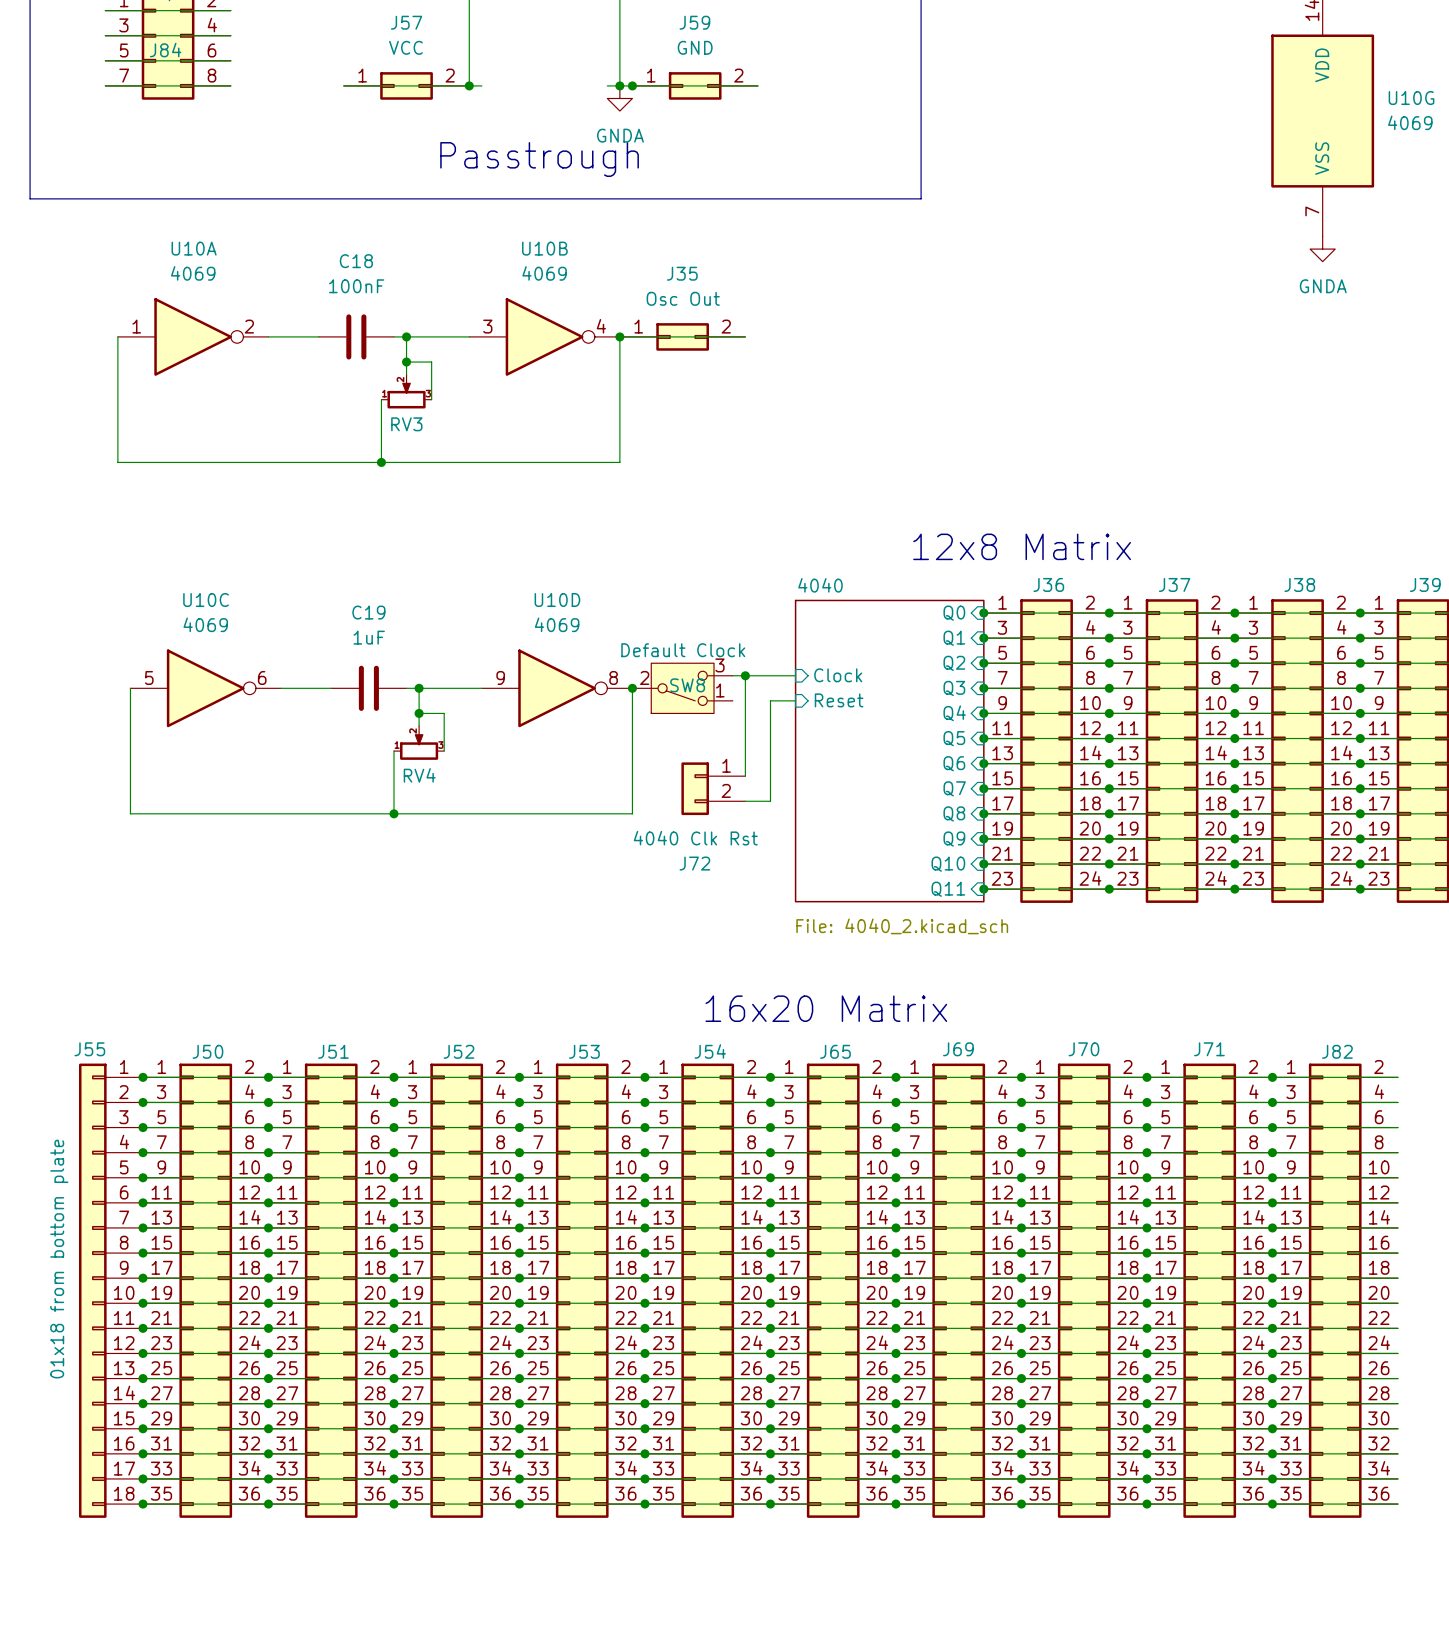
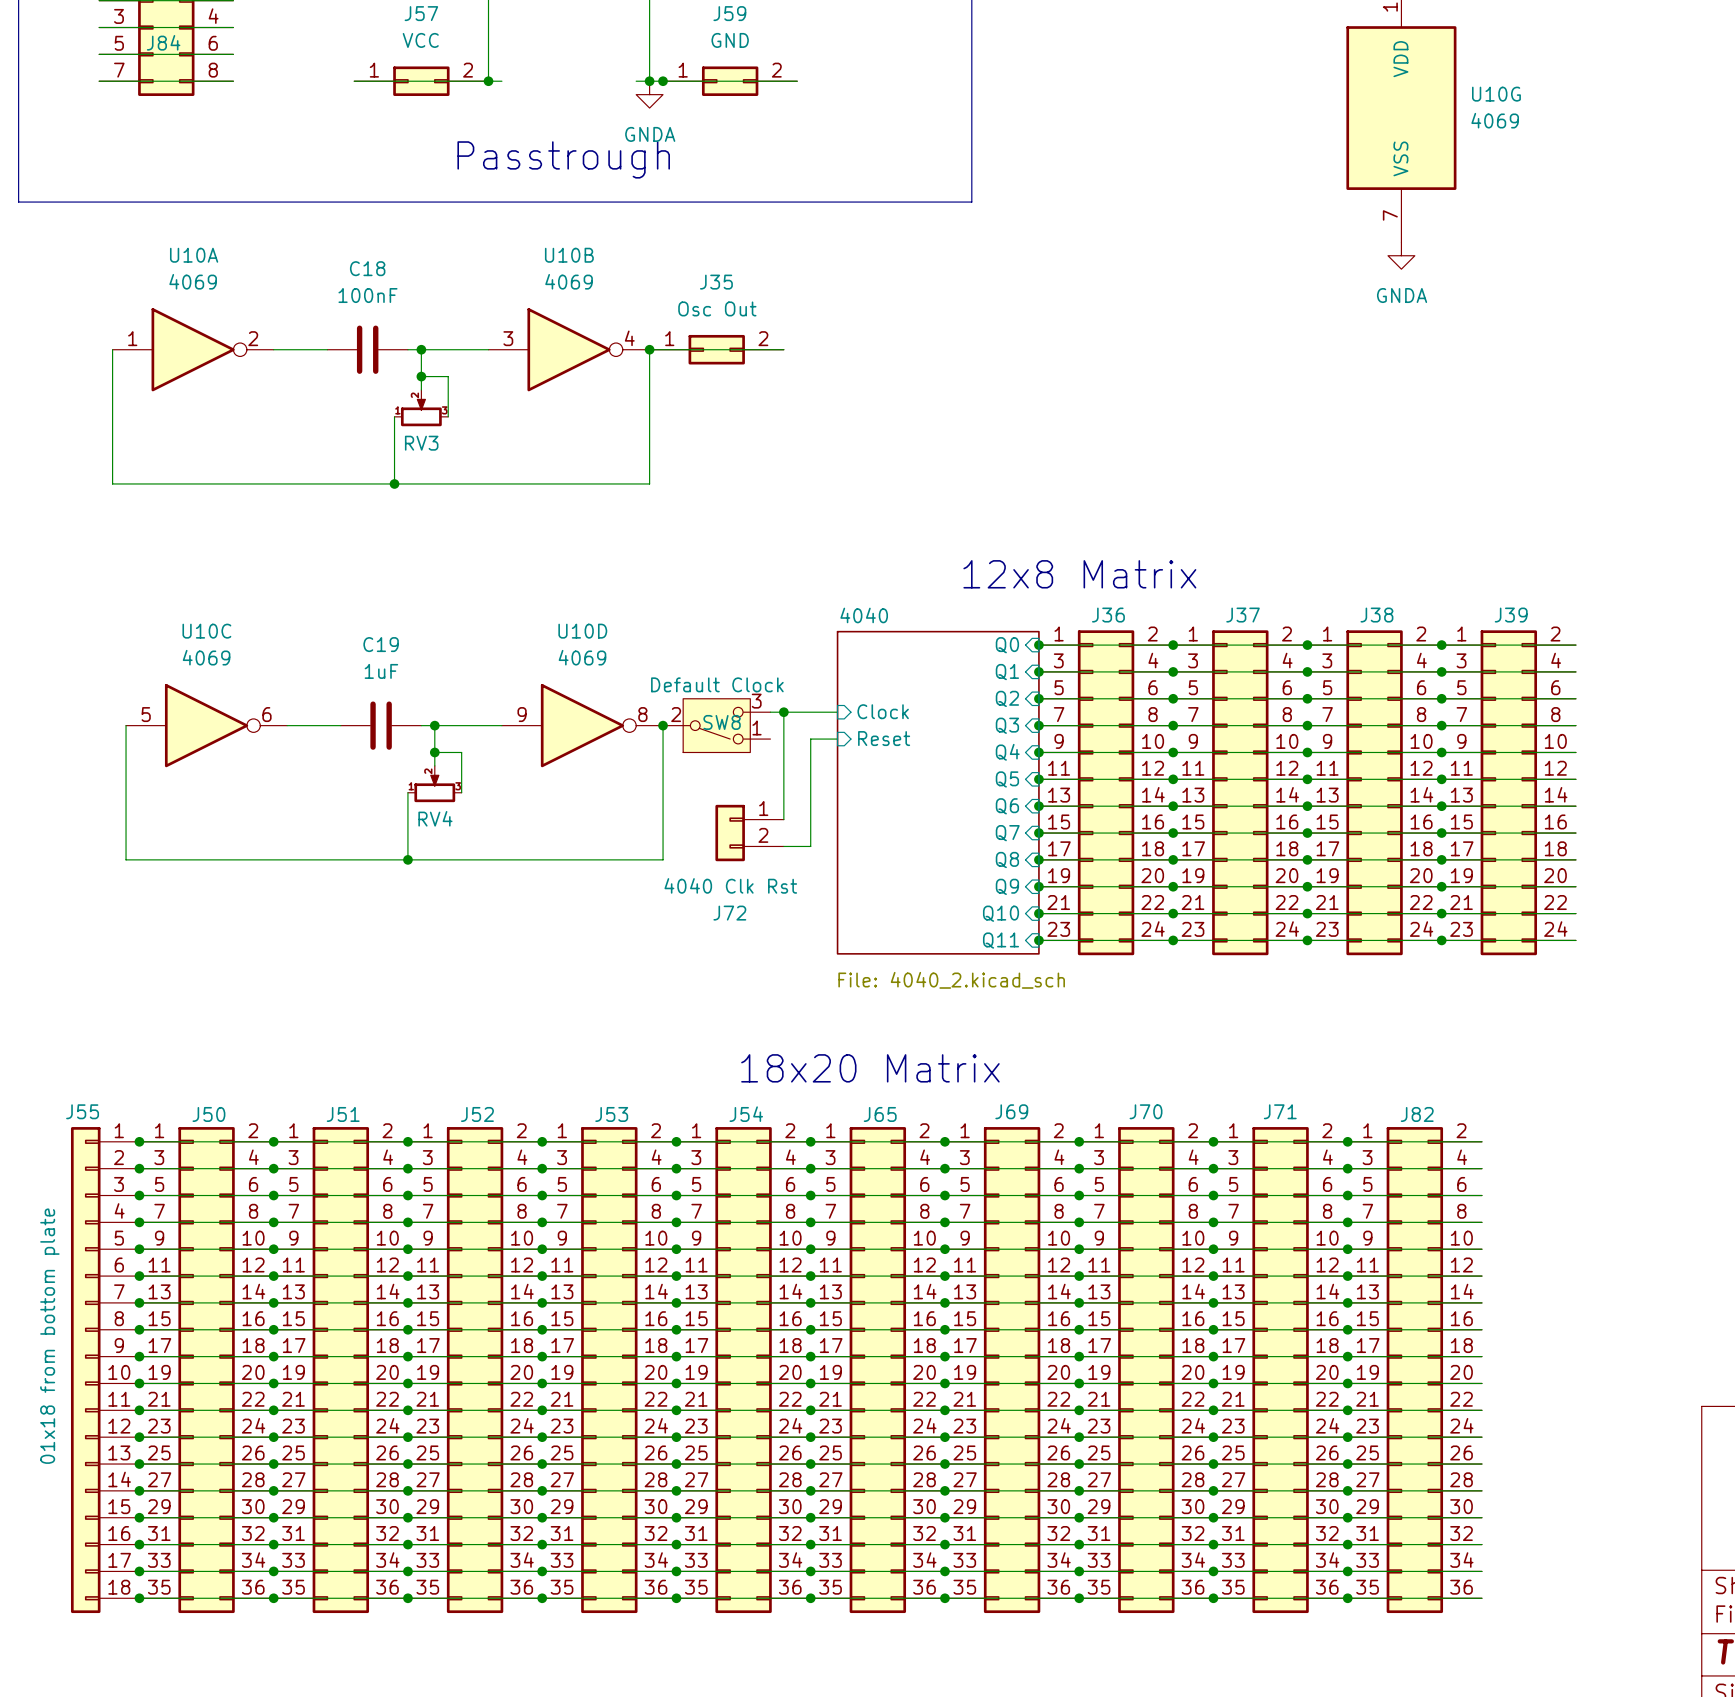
text: 16x20 Matrix (826, 1008) -> 18x20 Matrix (870, 1068)

